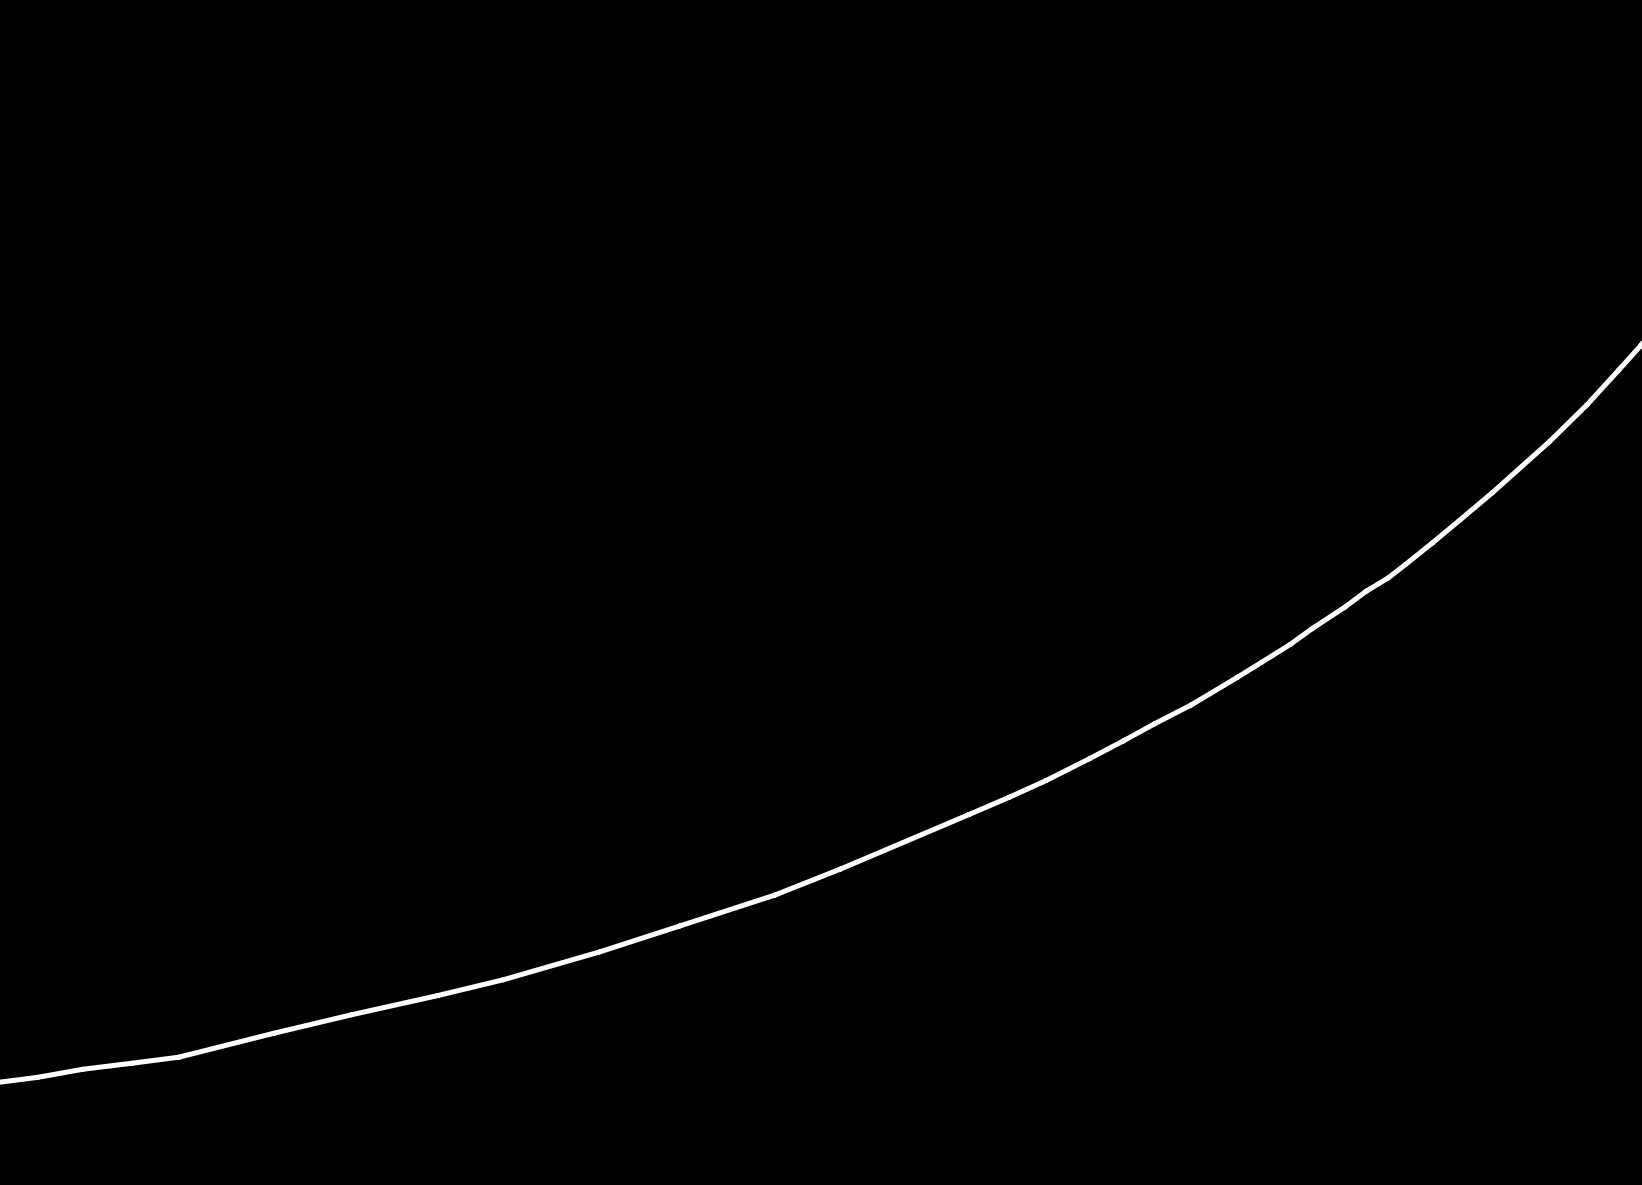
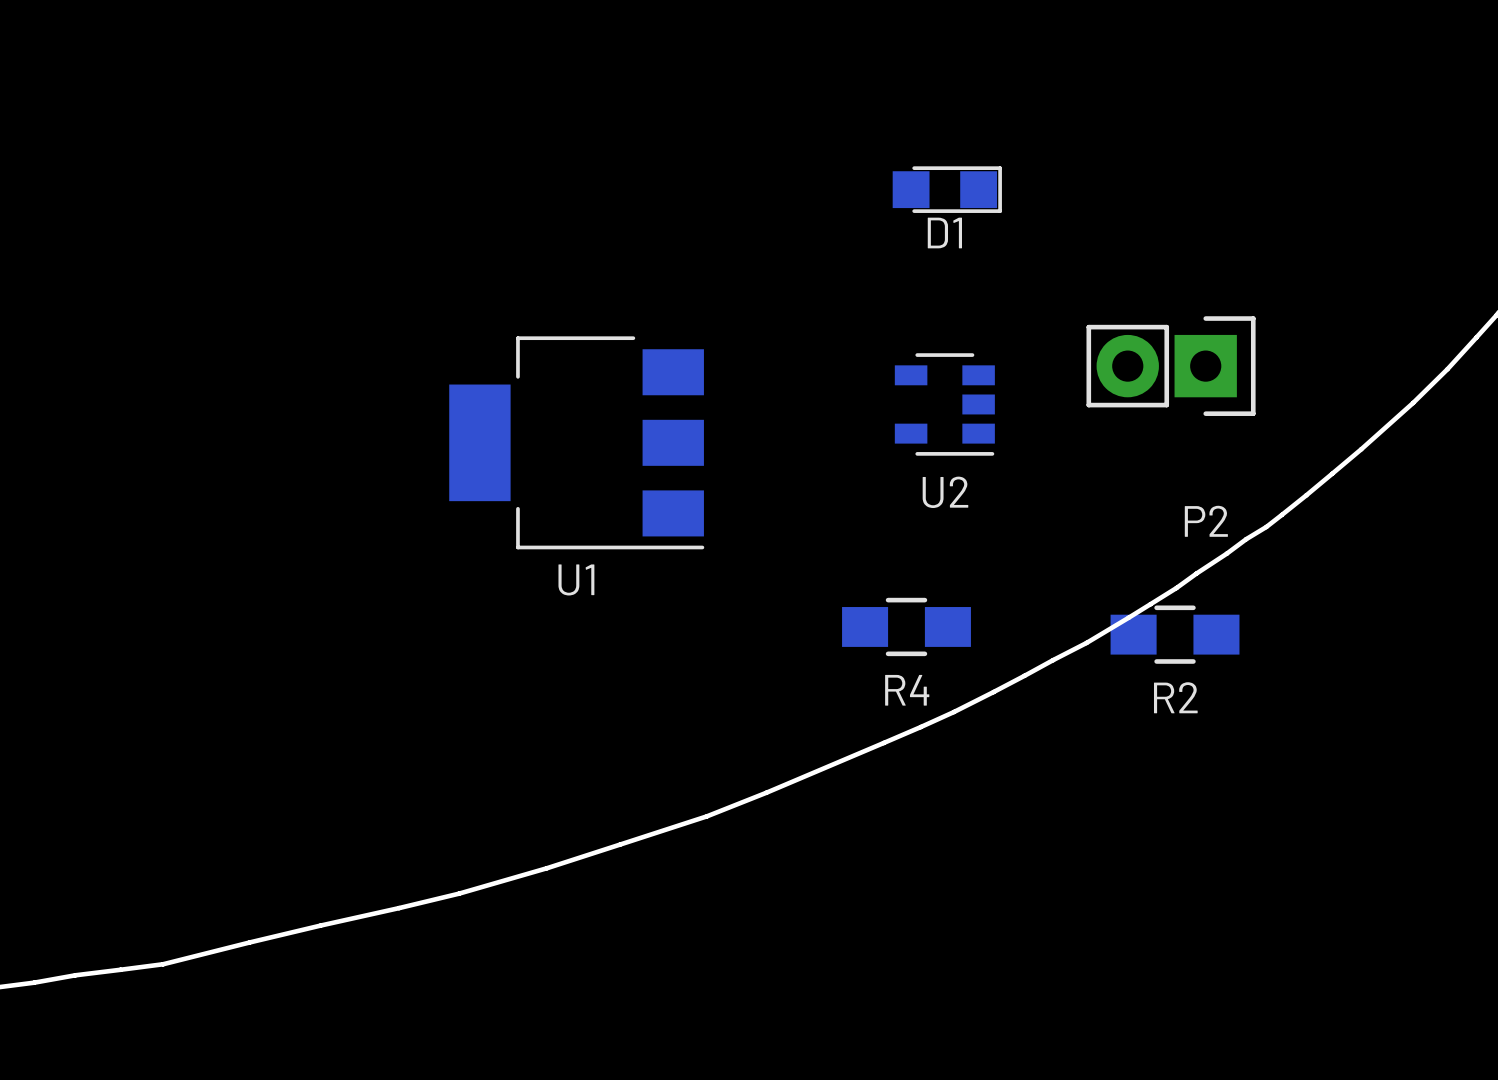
D1: none -> (947, 189)
P2: none -> (1171, 366)
U2: none -> (944, 404)
U1: none -> (576, 442)
R4: none -> (906, 626)
R2: none -> (1175, 634)

